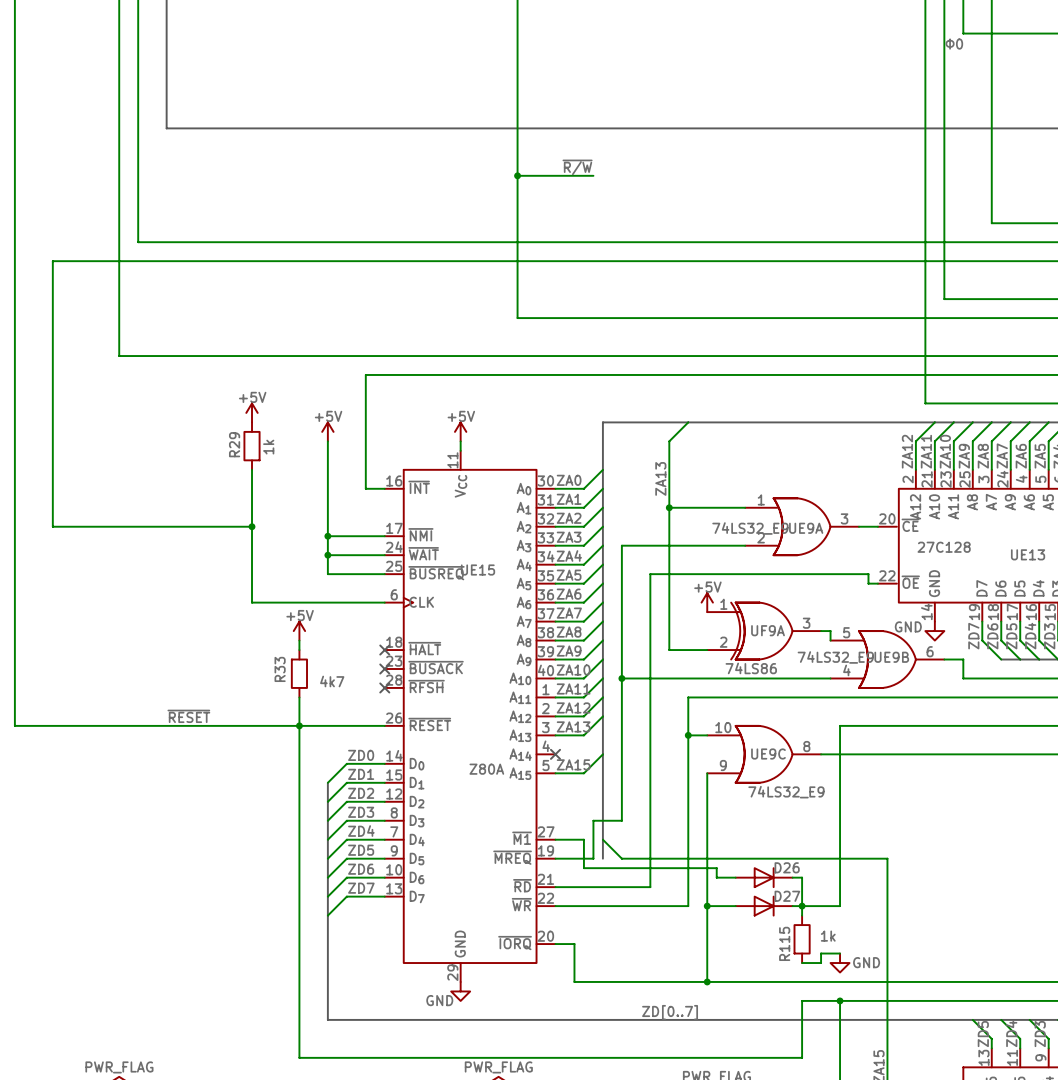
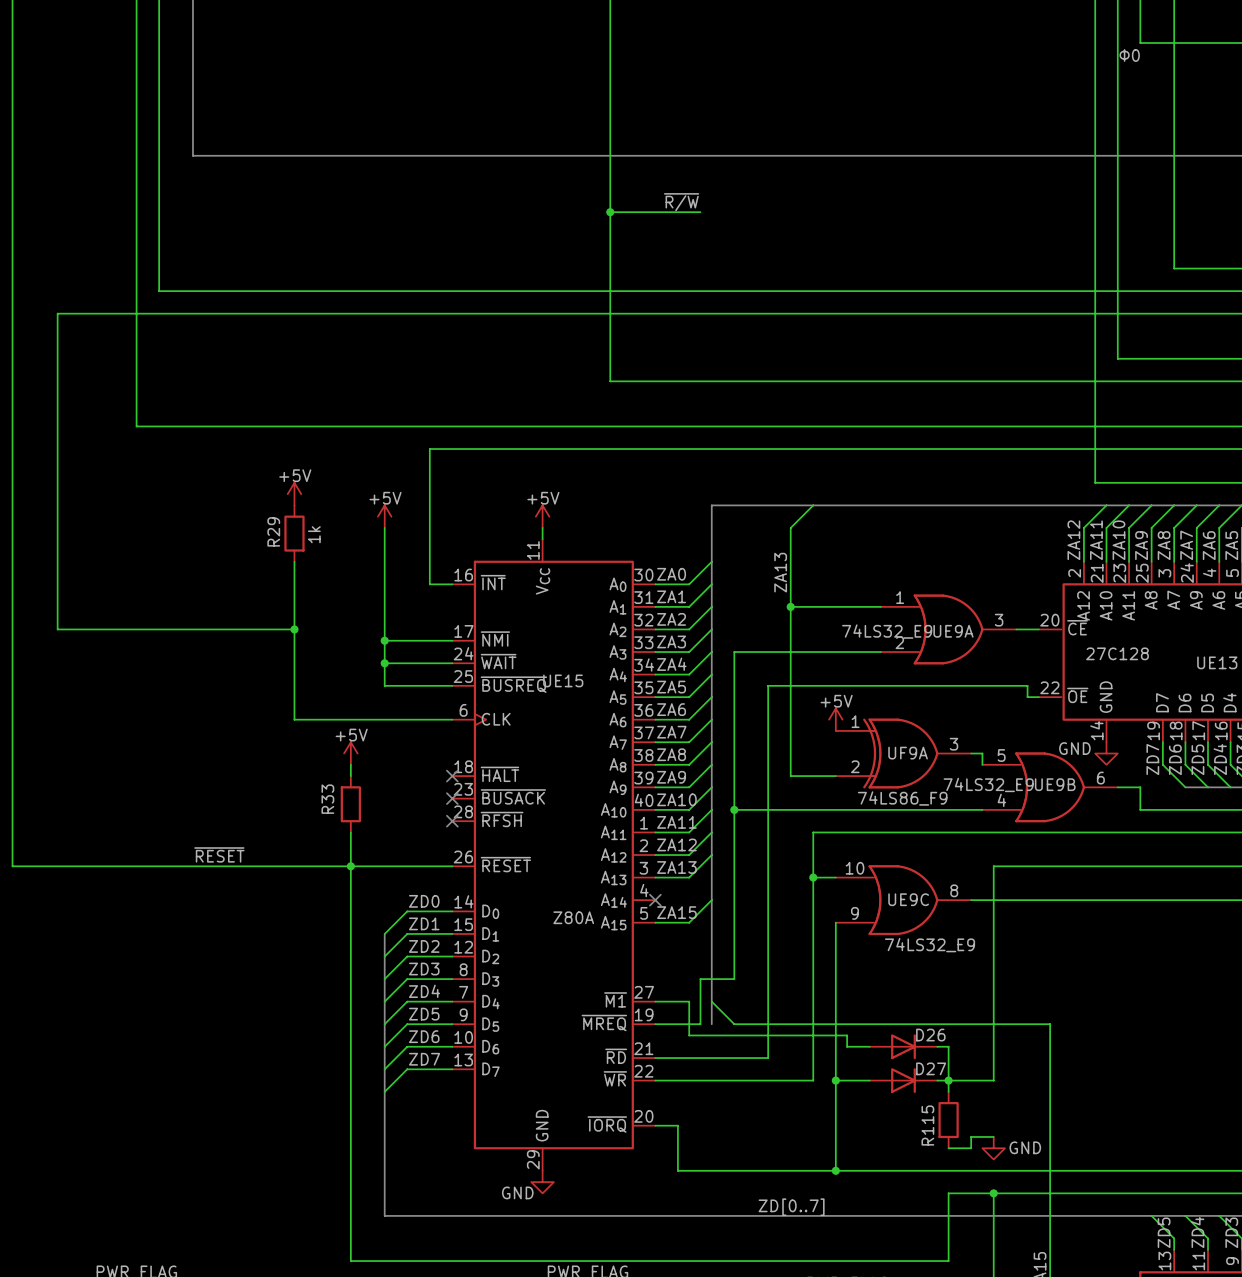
UF9A value: 74LS86 (751, 668) -> 74LS86_F9 (902, 798)
R33 value: 4k7 (332, 681) -> none
R115 value: 1k (828, 936) -> none

